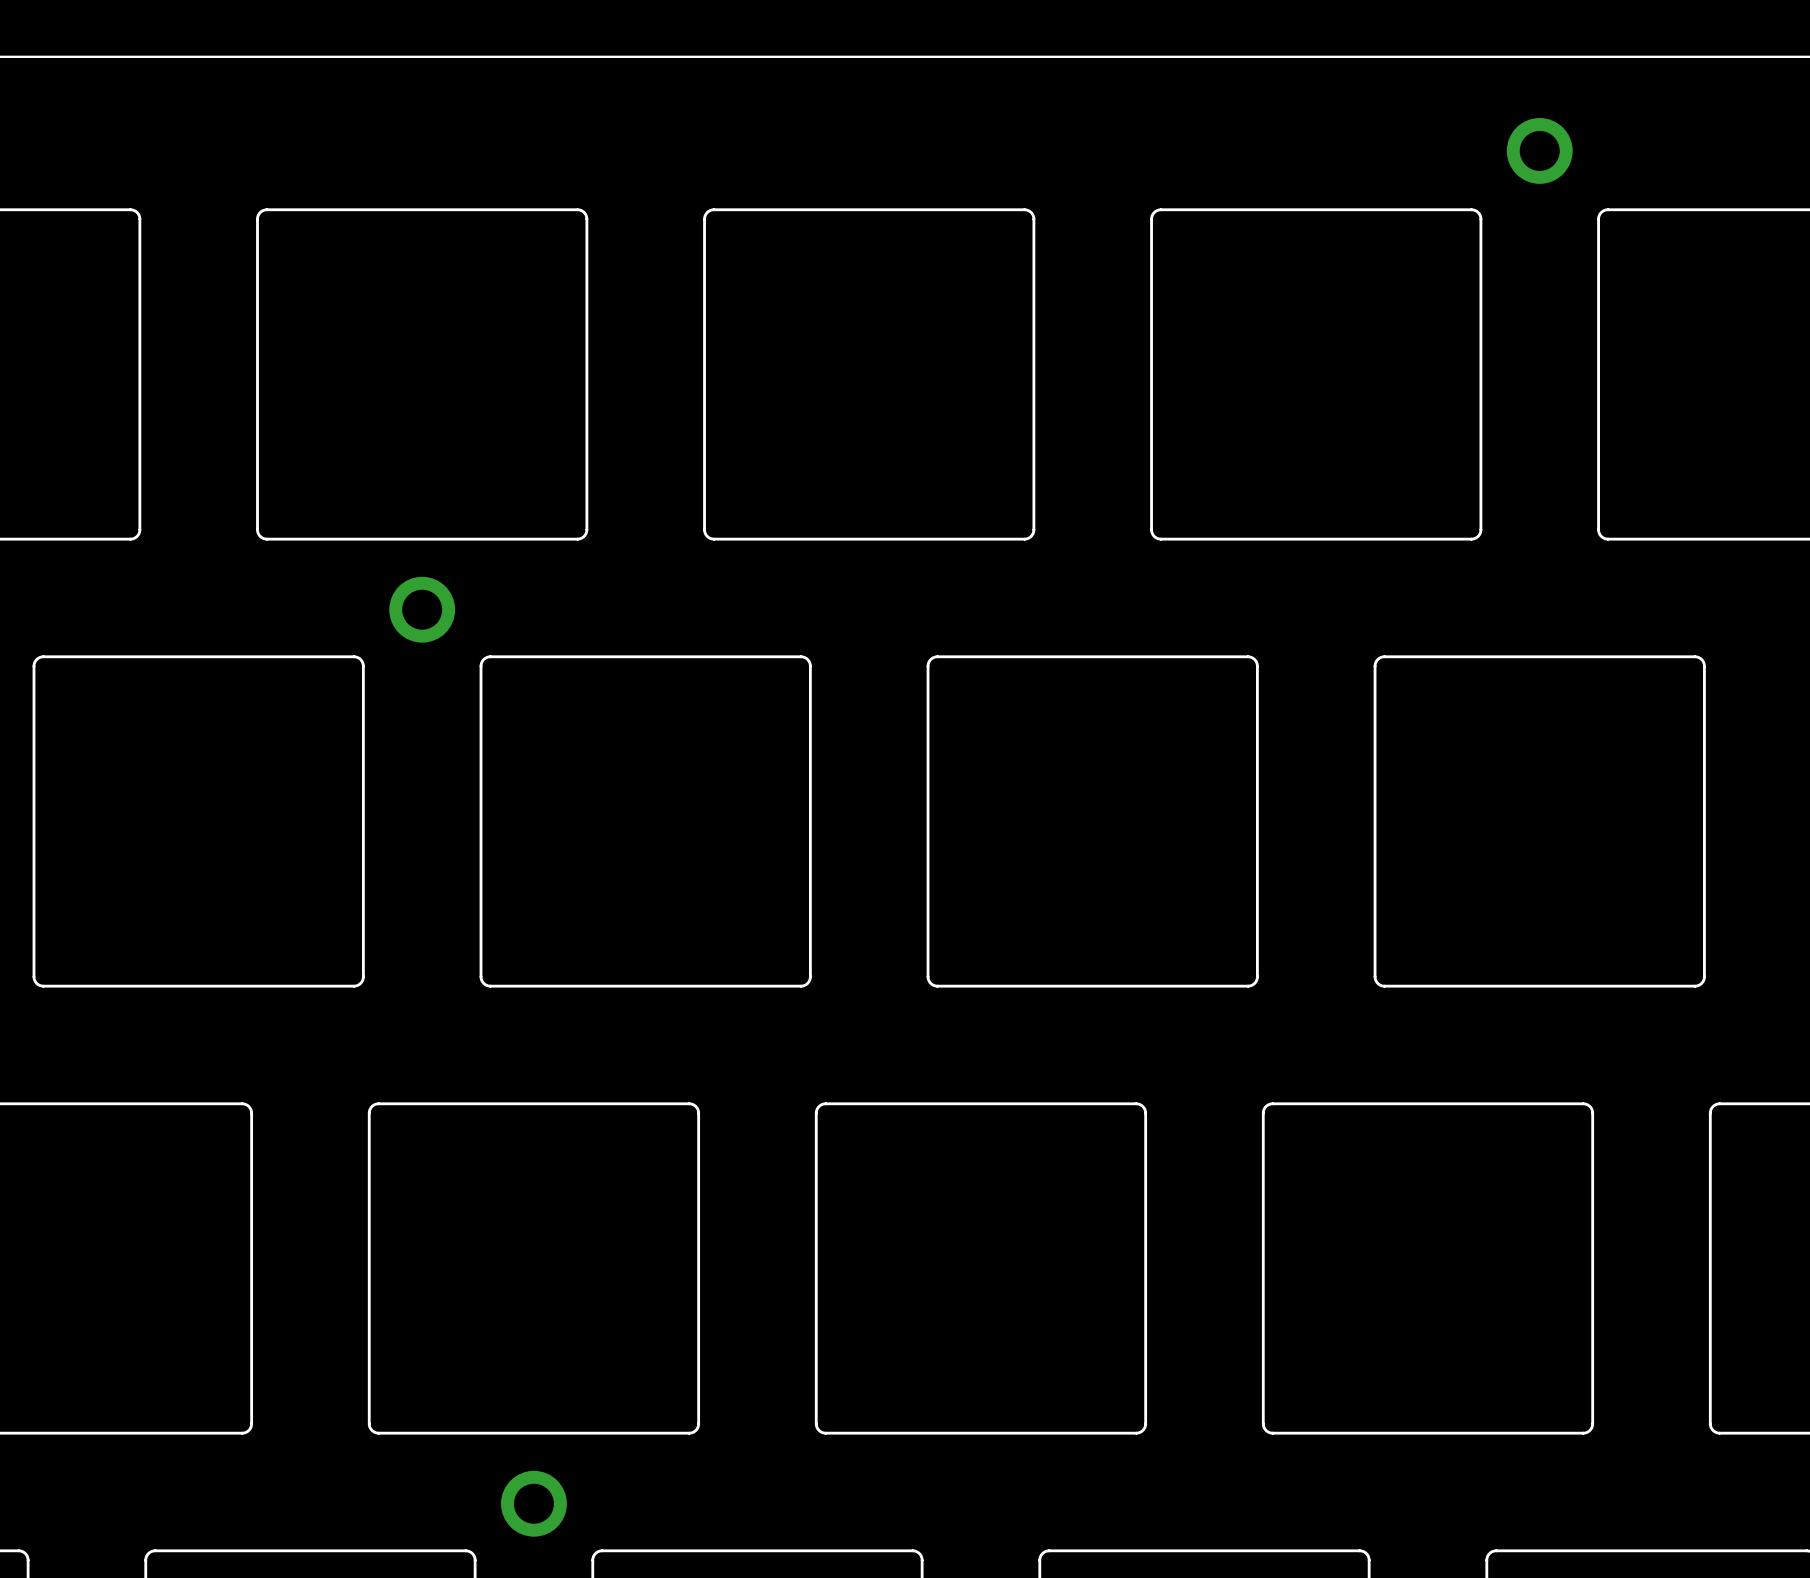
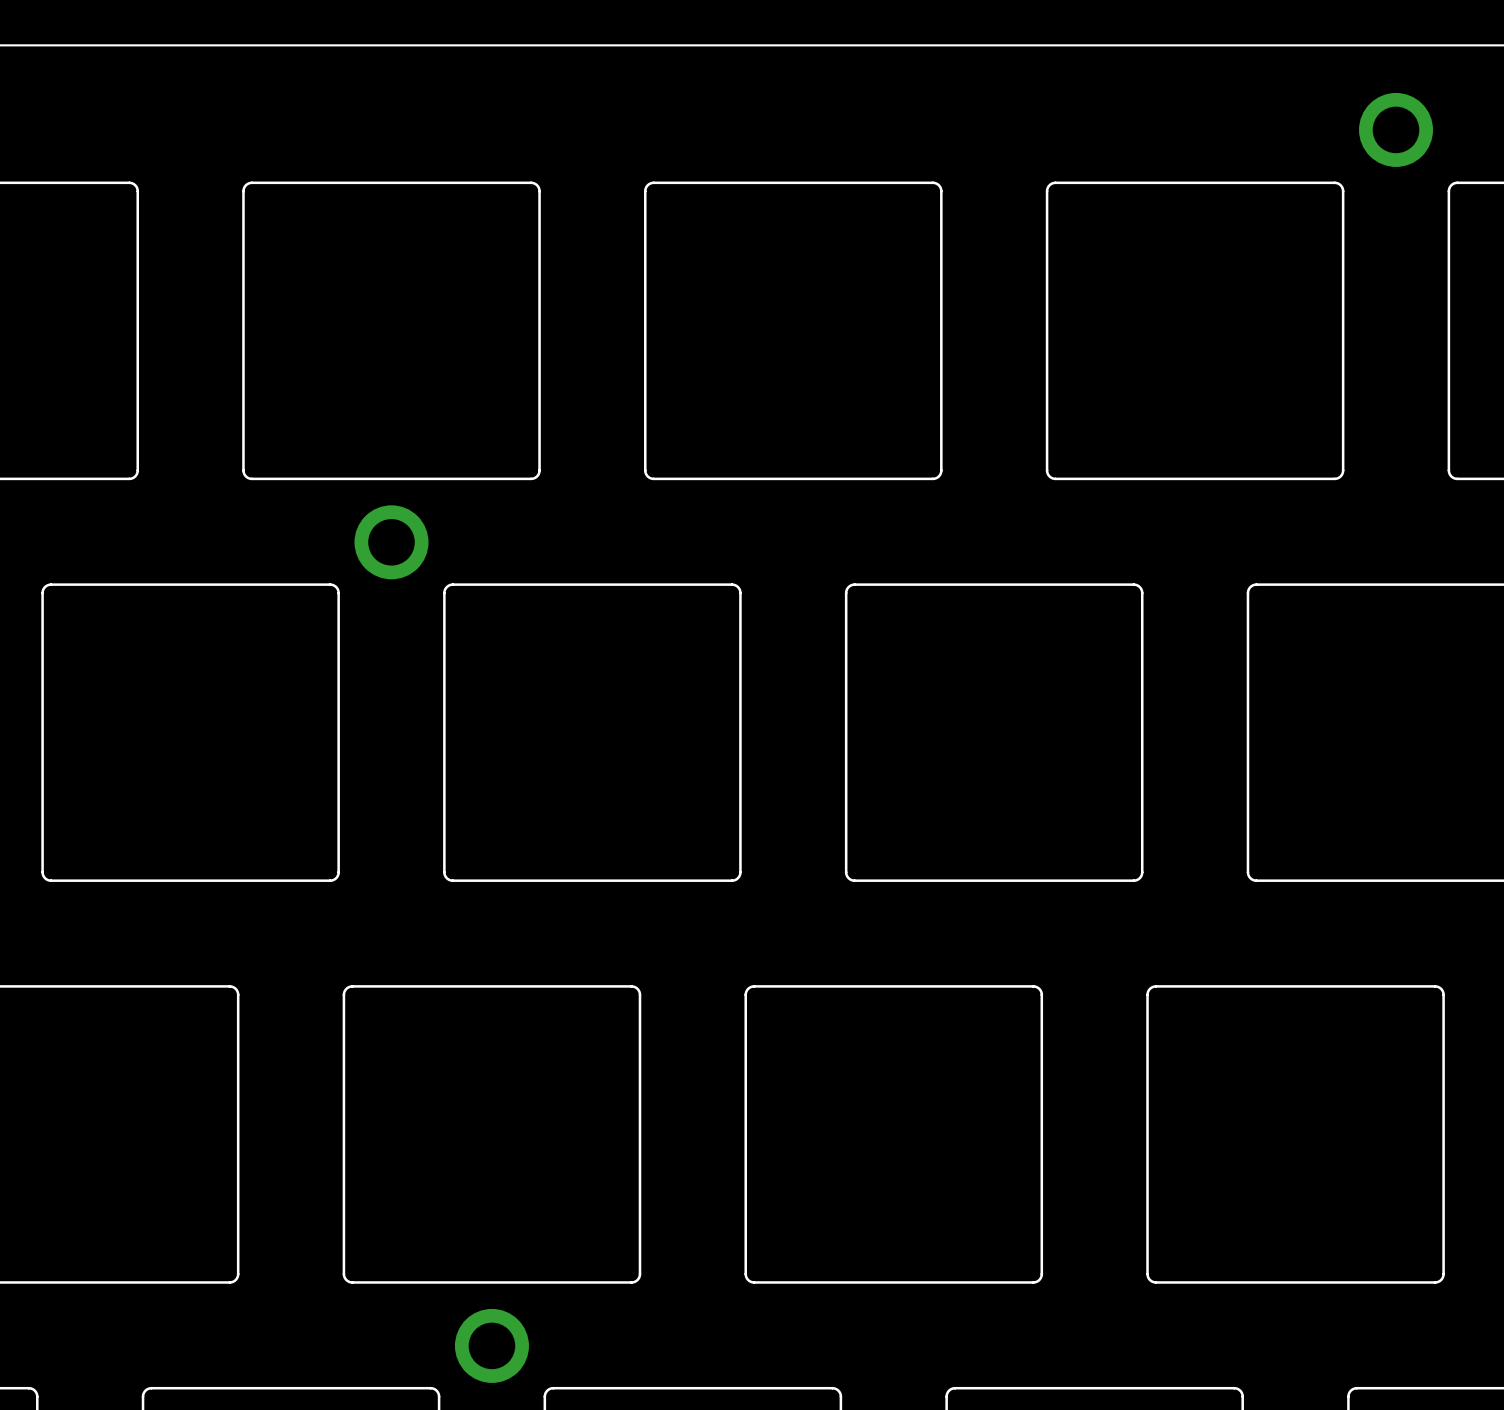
part footprint: [1506, 118, 1573, 184] -> [1359, 92, 1434, 167]
part footprint: [389, 576, 456, 643] -> [354, 505, 429, 580]
part footprint: [501, 1470, 567, 1537] -> [454, 1308, 529, 1383]

